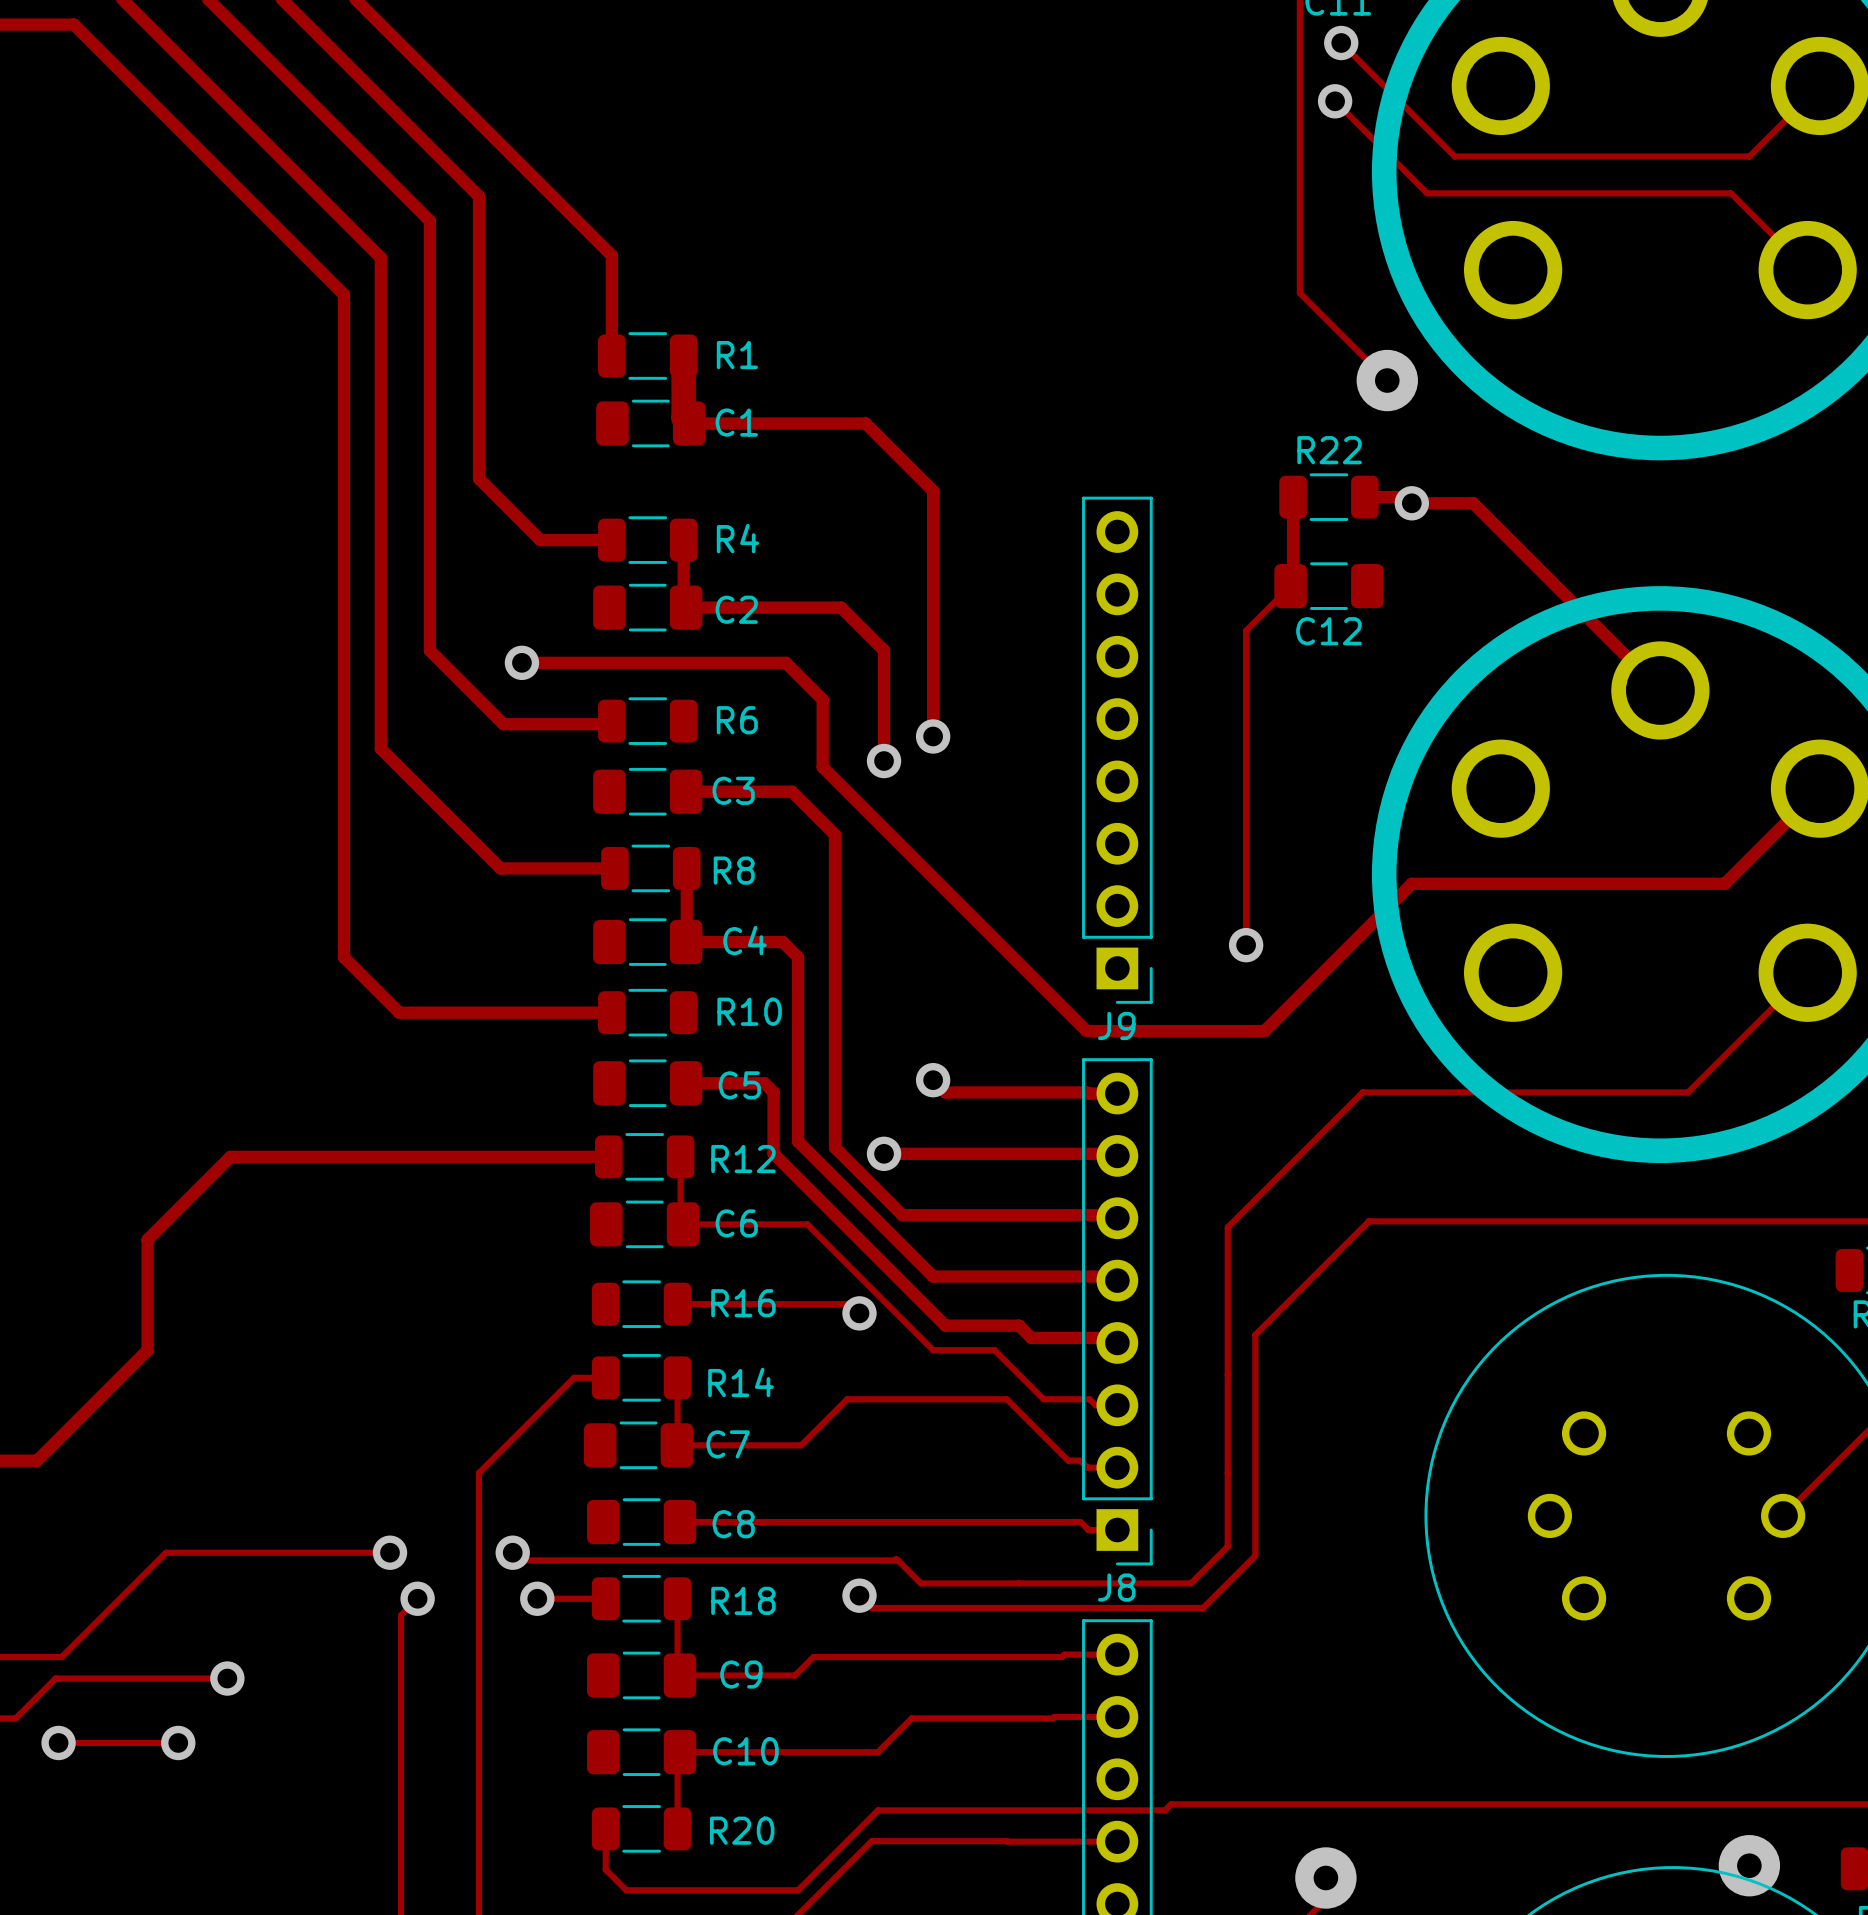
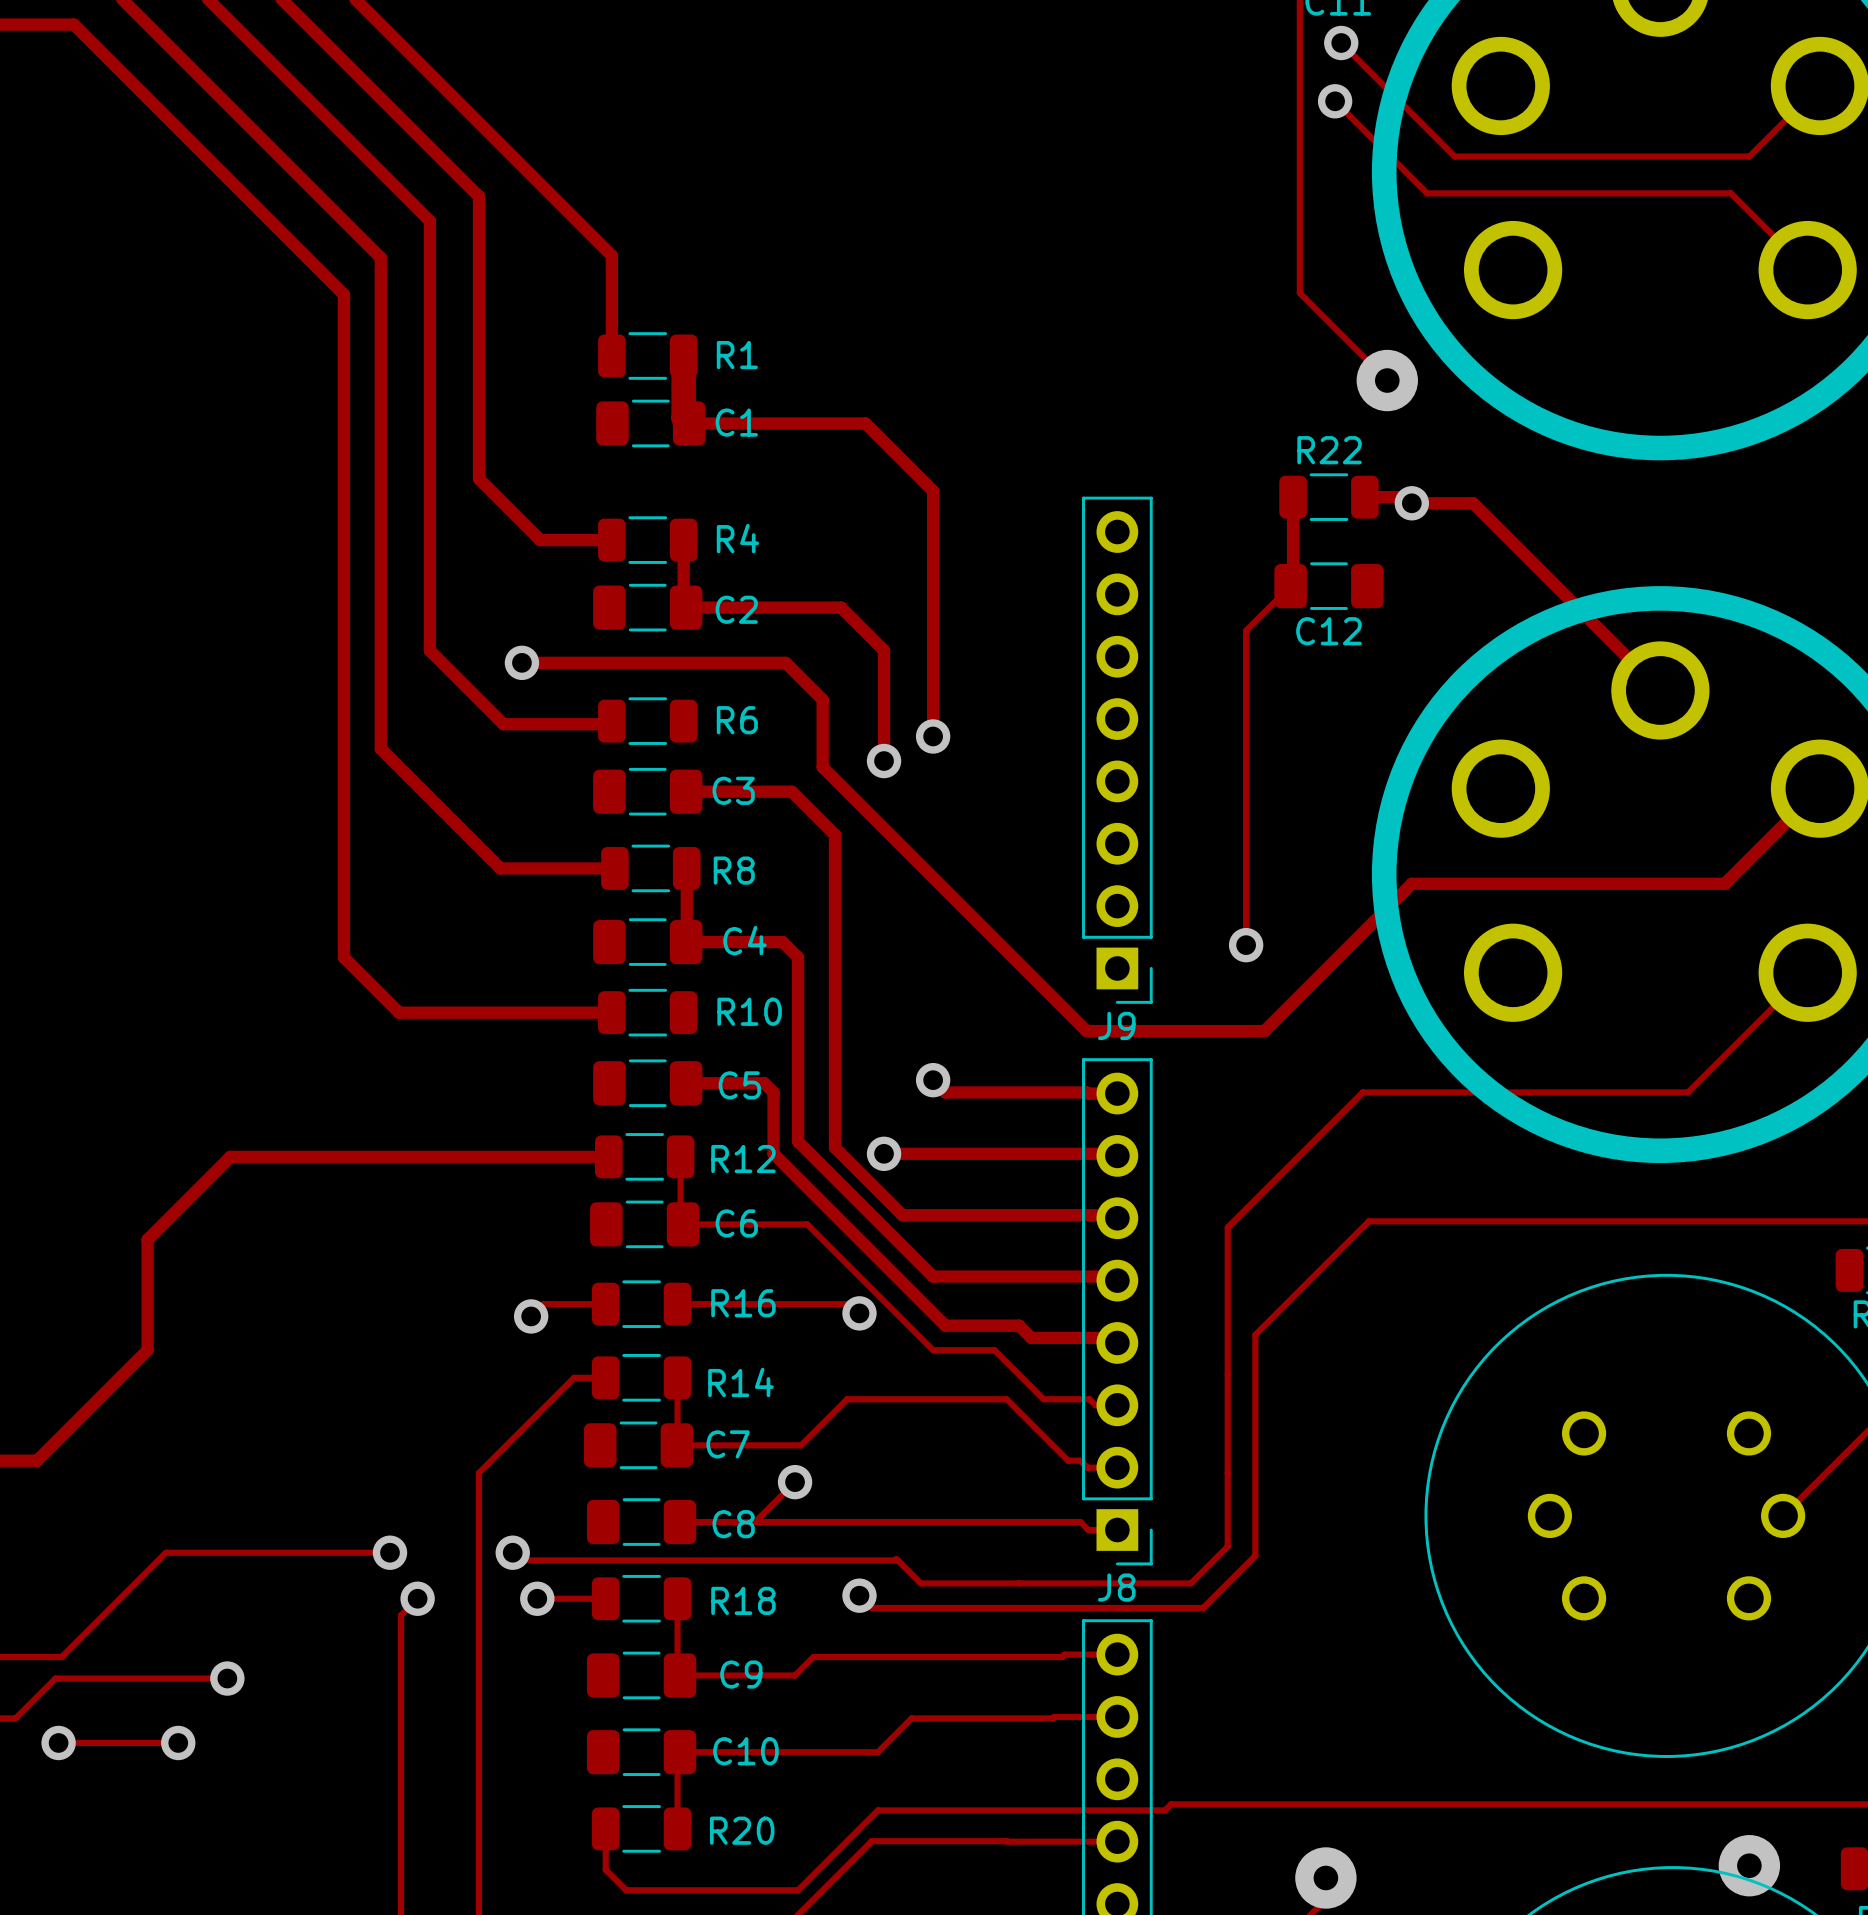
track: none -> (605, 1304) (543, 1304) (531, 1316)
via: none -> (531, 1316)
track: none -> (795, 1482) (755, 1522)
via: none -> (795, 1482)

